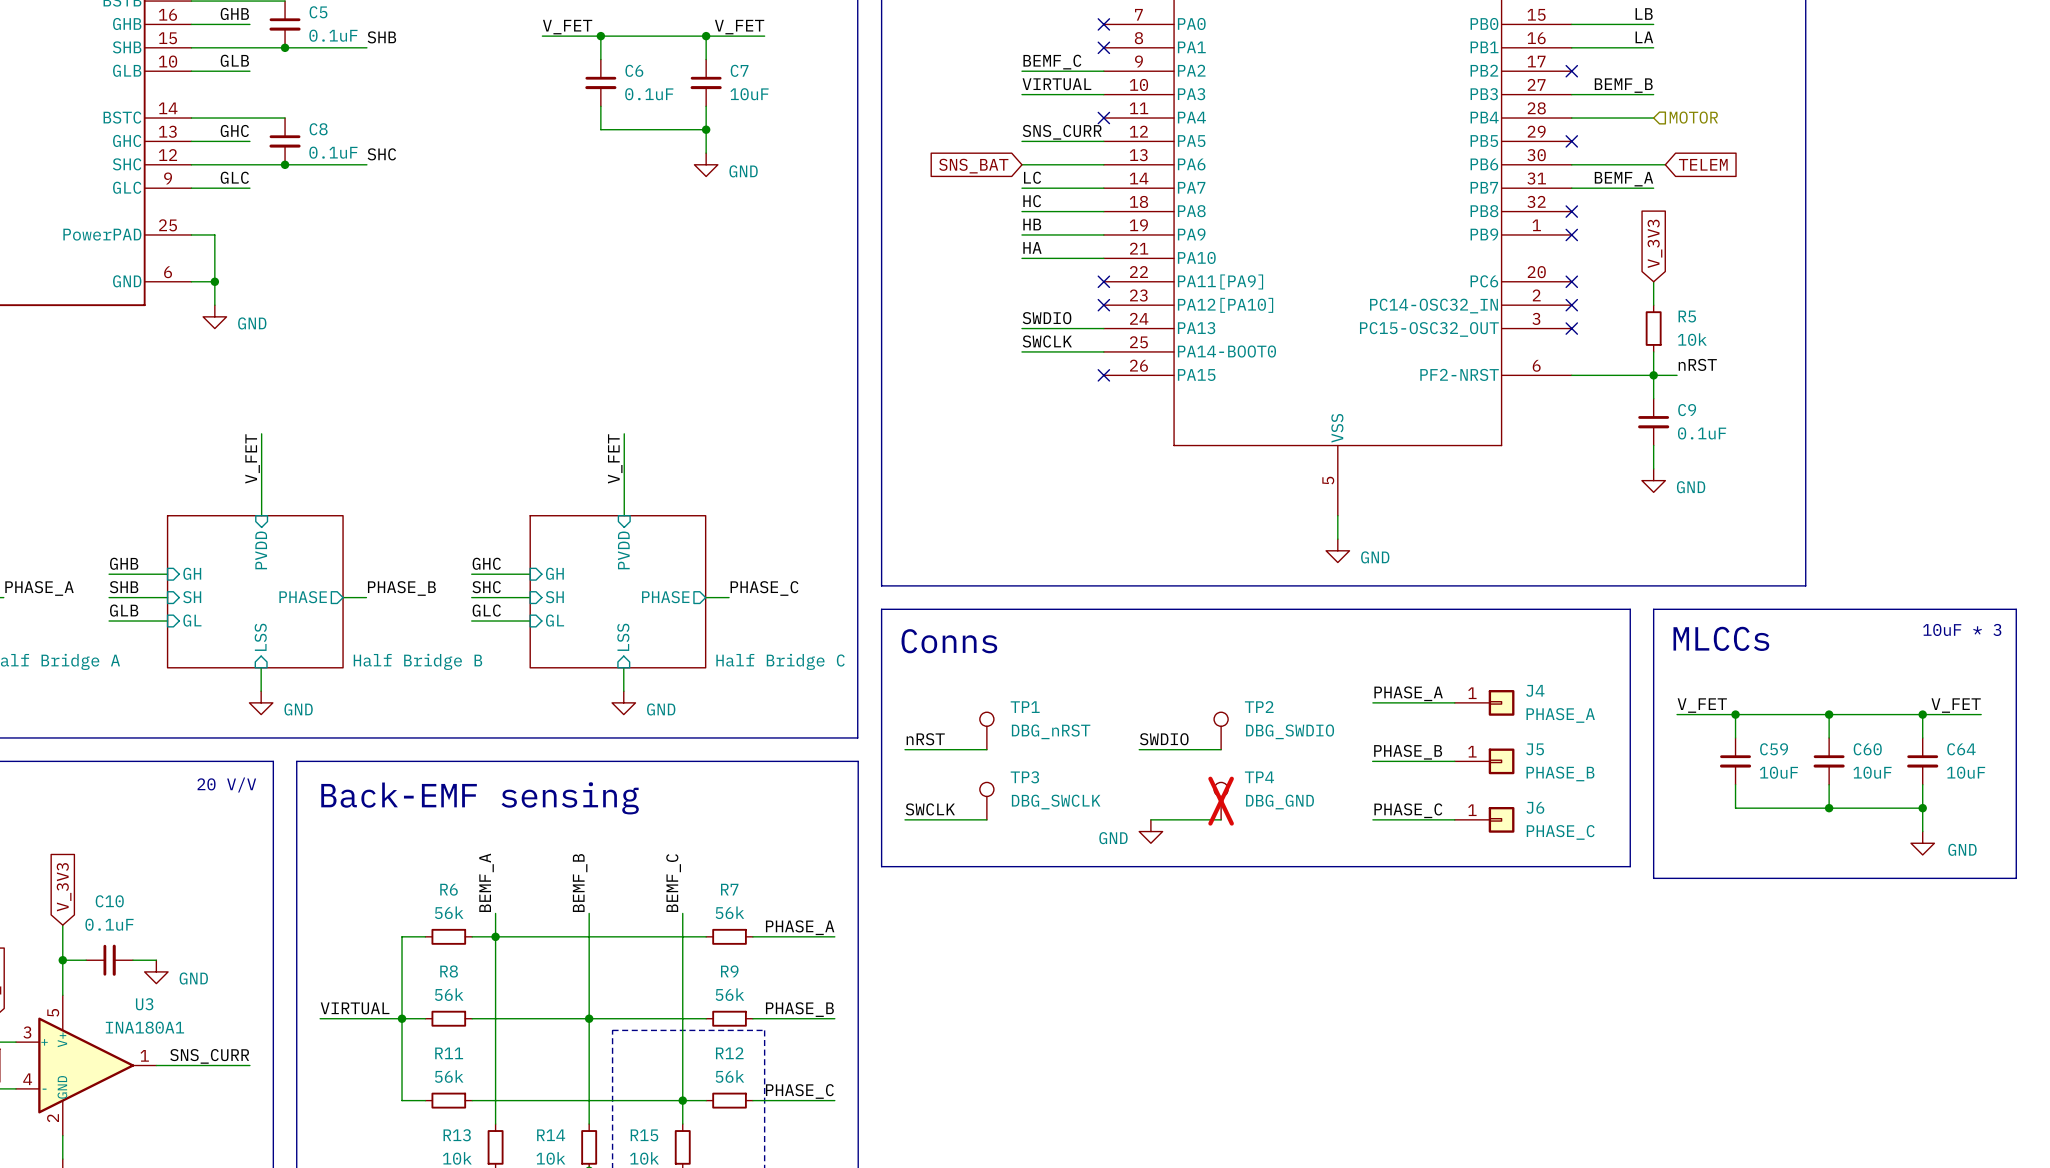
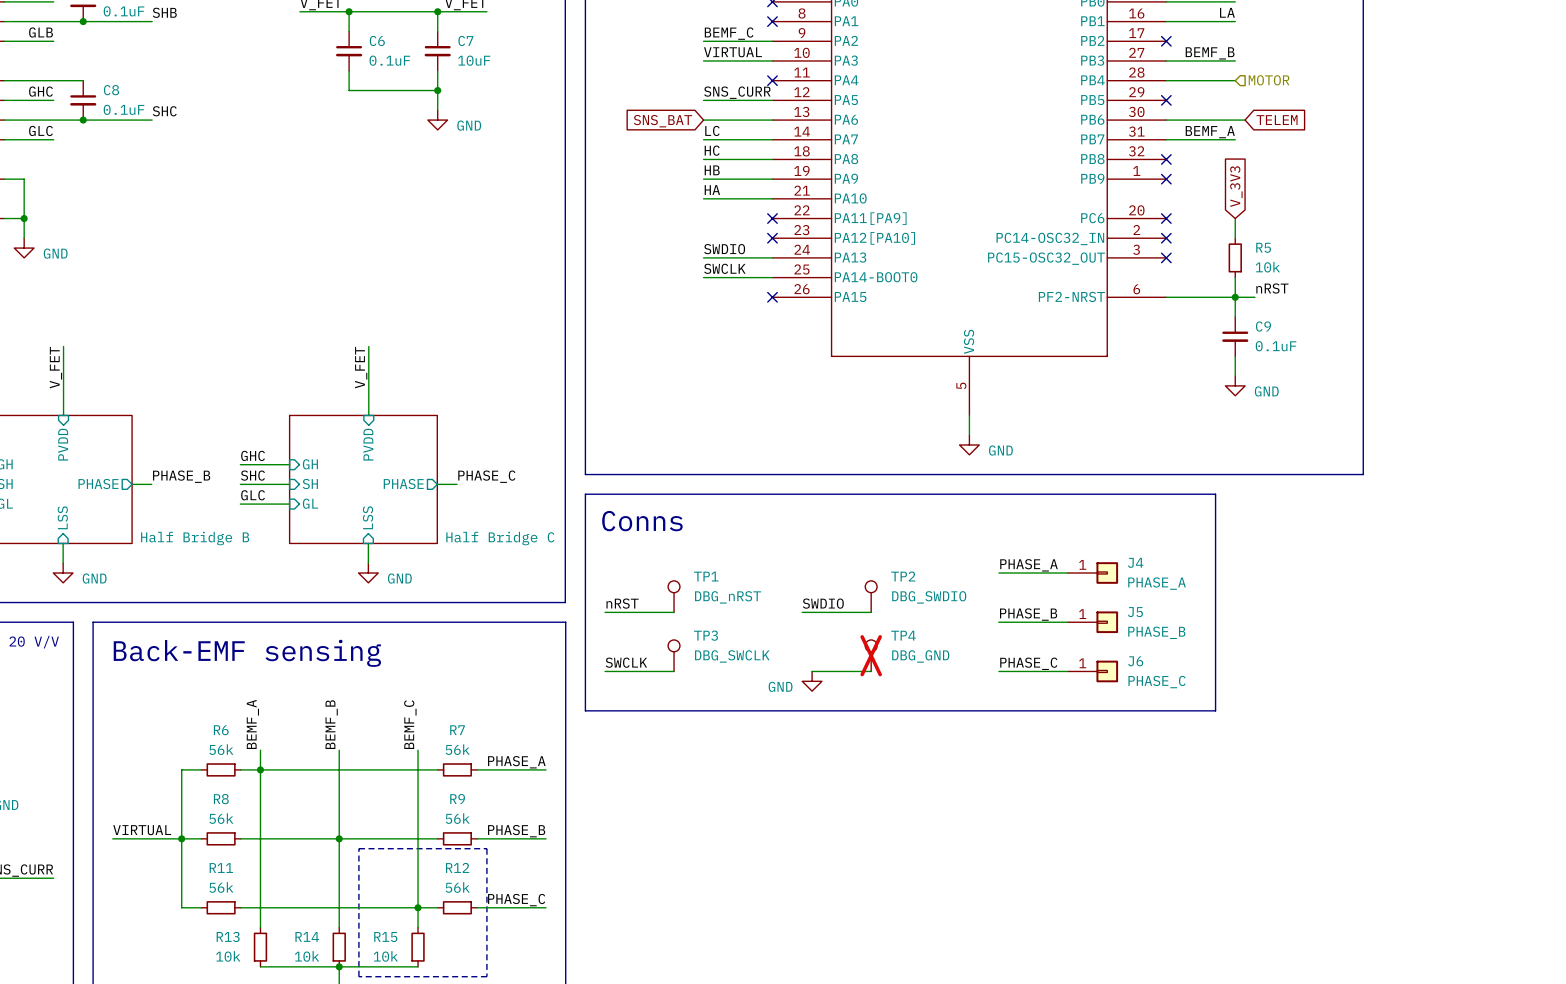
line: (1653, 609) (2016, 609) (2016, 878) (1653, 878) (1653, 609) -> none
text: 10uF * 3 (1962, 629) -> none
text: MLCCs (1721, 638) -> none
label: V_FET (1702, 705) -> none
label: V_FET (1956, 705) -> none
wire: (1677, 714) (1981, 714) -> none
wire: (1735, 714) (1735, 737) -> none
junction: (1735, 714) -> none
wire: (1829, 714) (1829, 737) -> none
junction: (1829, 714) -> none
wire: (1922, 714) (1922, 737) -> none
junction: (1922, 714) -> none
C59: 10uF (1735, 761) -> none
C60: 10uF (1829, 761) -> none
C64: 10uF (1922, 761) -> none
wire: (1735, 784) (1735, 808) (1922, 808) -> none
wire: (1829, 784) (1829, 808) -> none
wire: (1922, 784) (1922, 831) -> none
junction: (1829, 808) -> none
junction: (1922, 808) -> none
power symbol: GND (1922, 843) -> none

